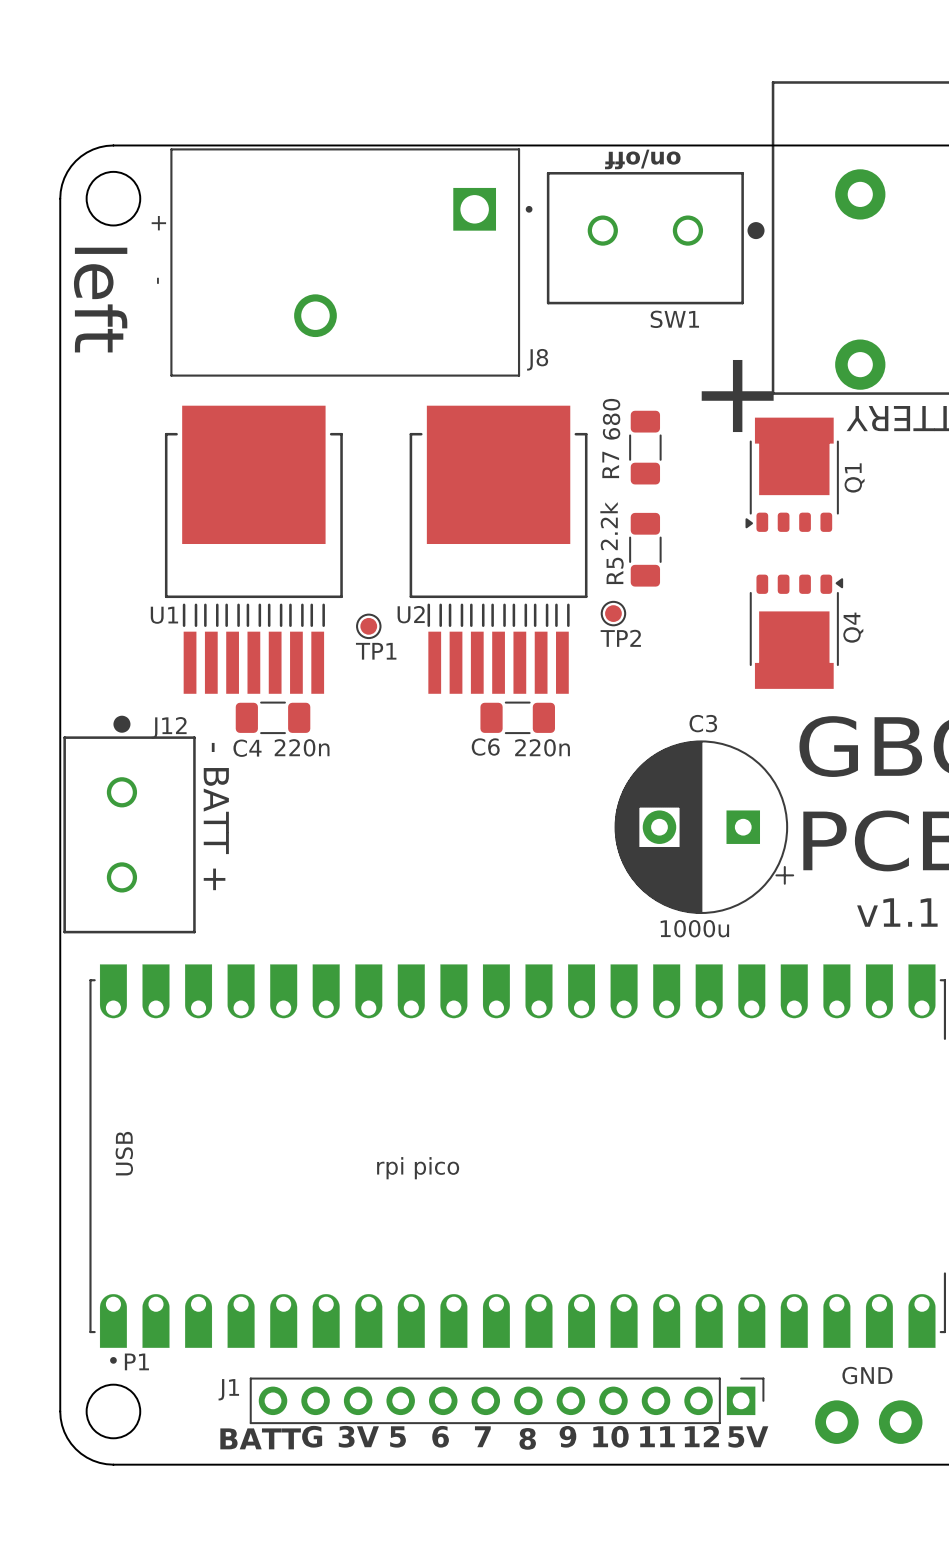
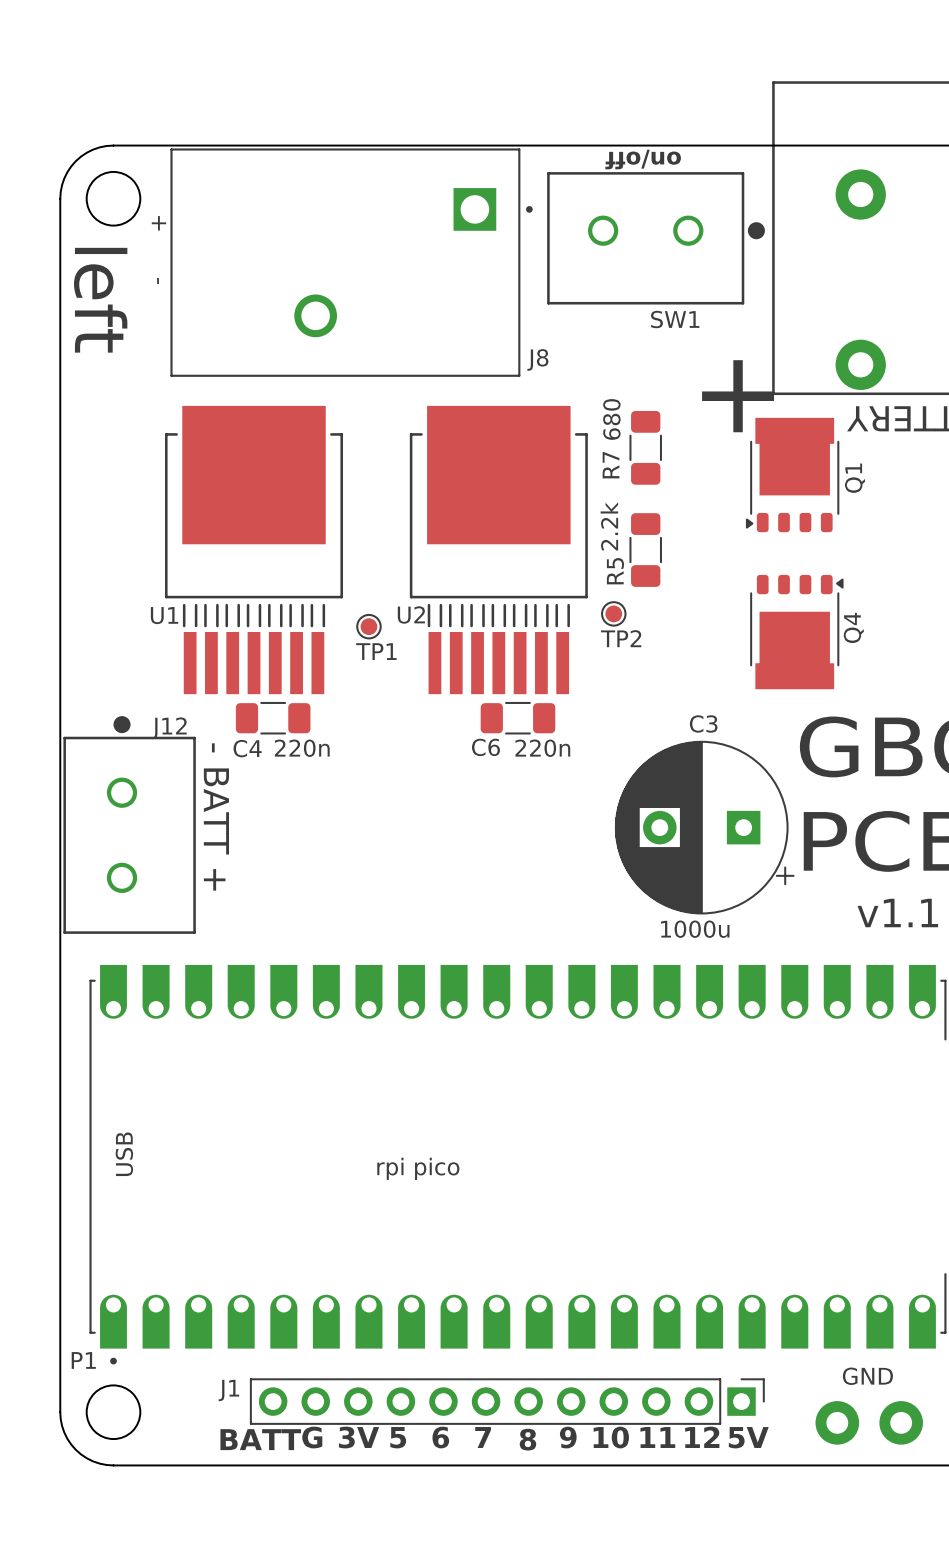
P1 name position: P1 (136, 1361) -> P1 (83, 1360)

